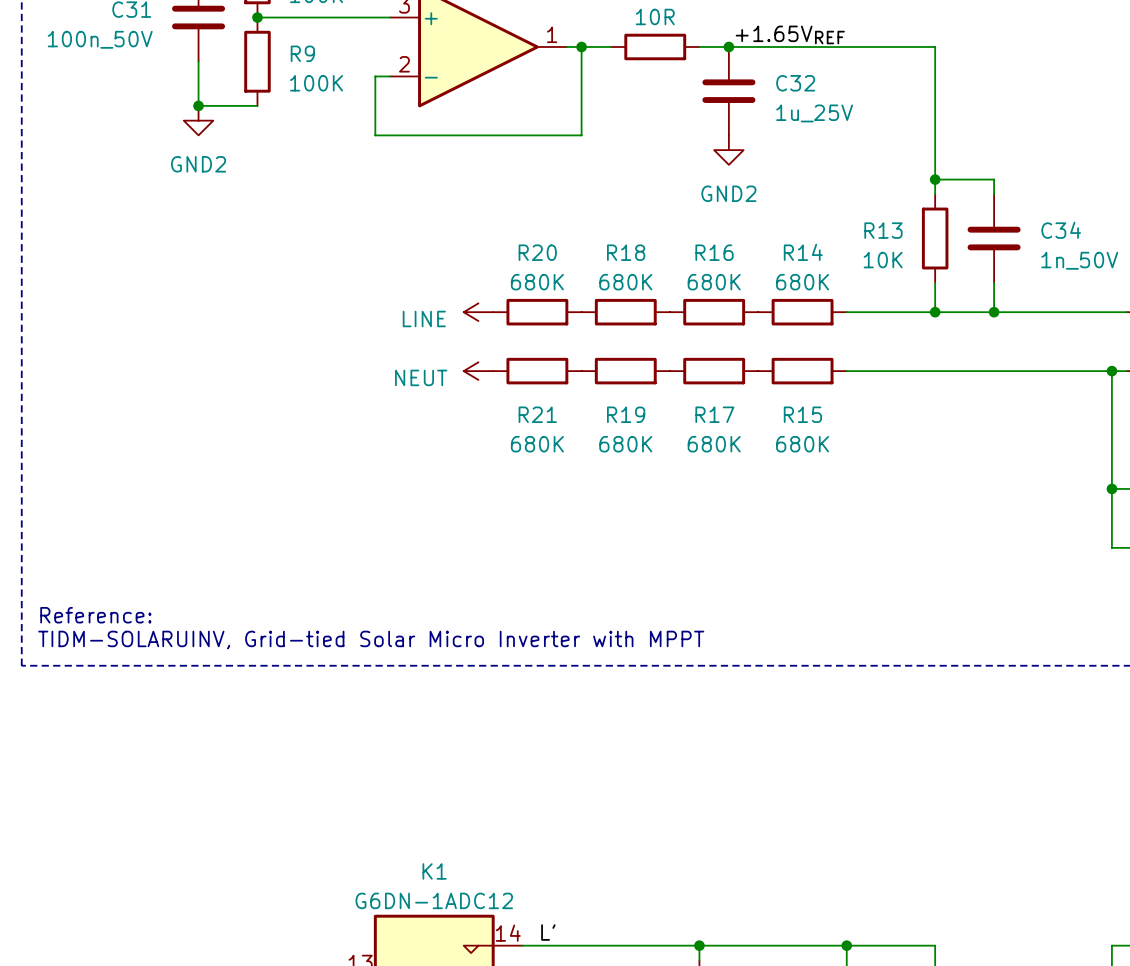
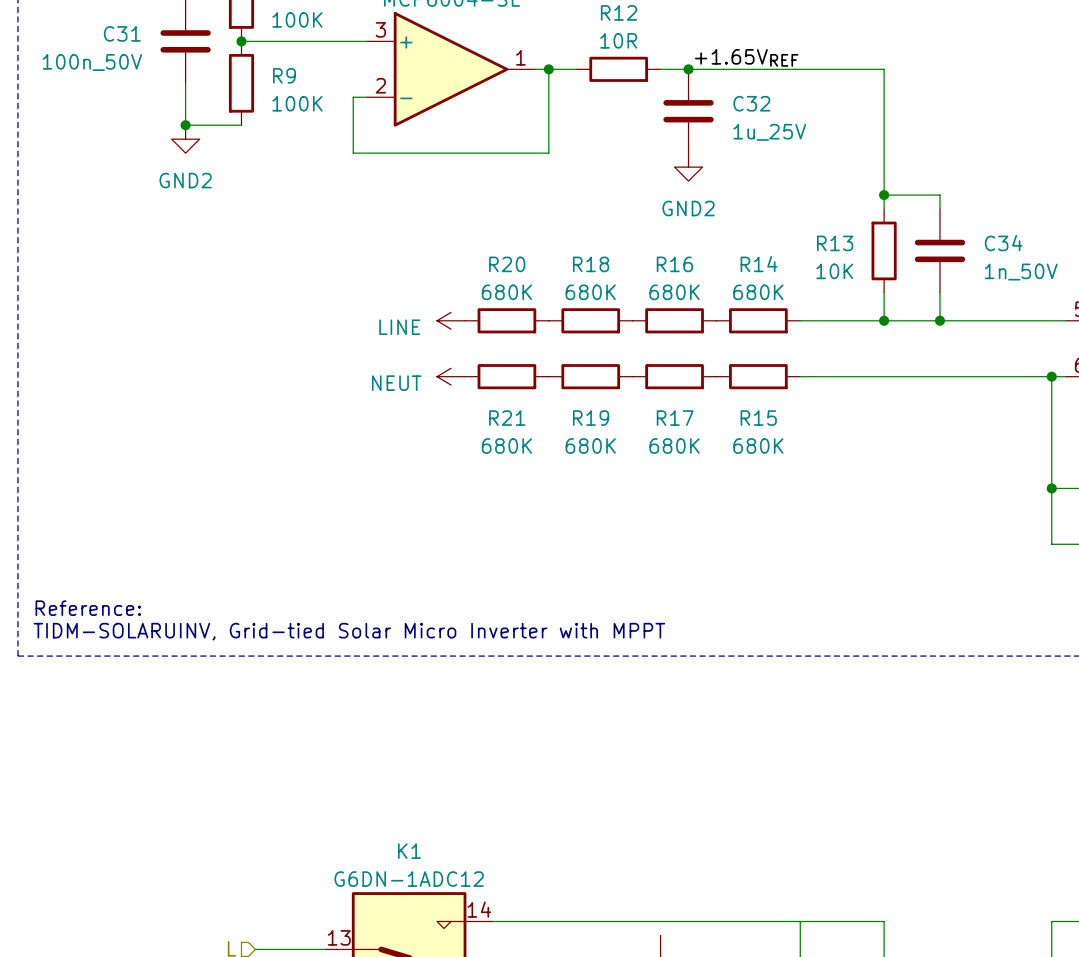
label: L' (548, 932) -> none
wire: (699, 945) (699, 960) -> none
junction: (699, 945) -> none
junction: (846, 945) -> none

